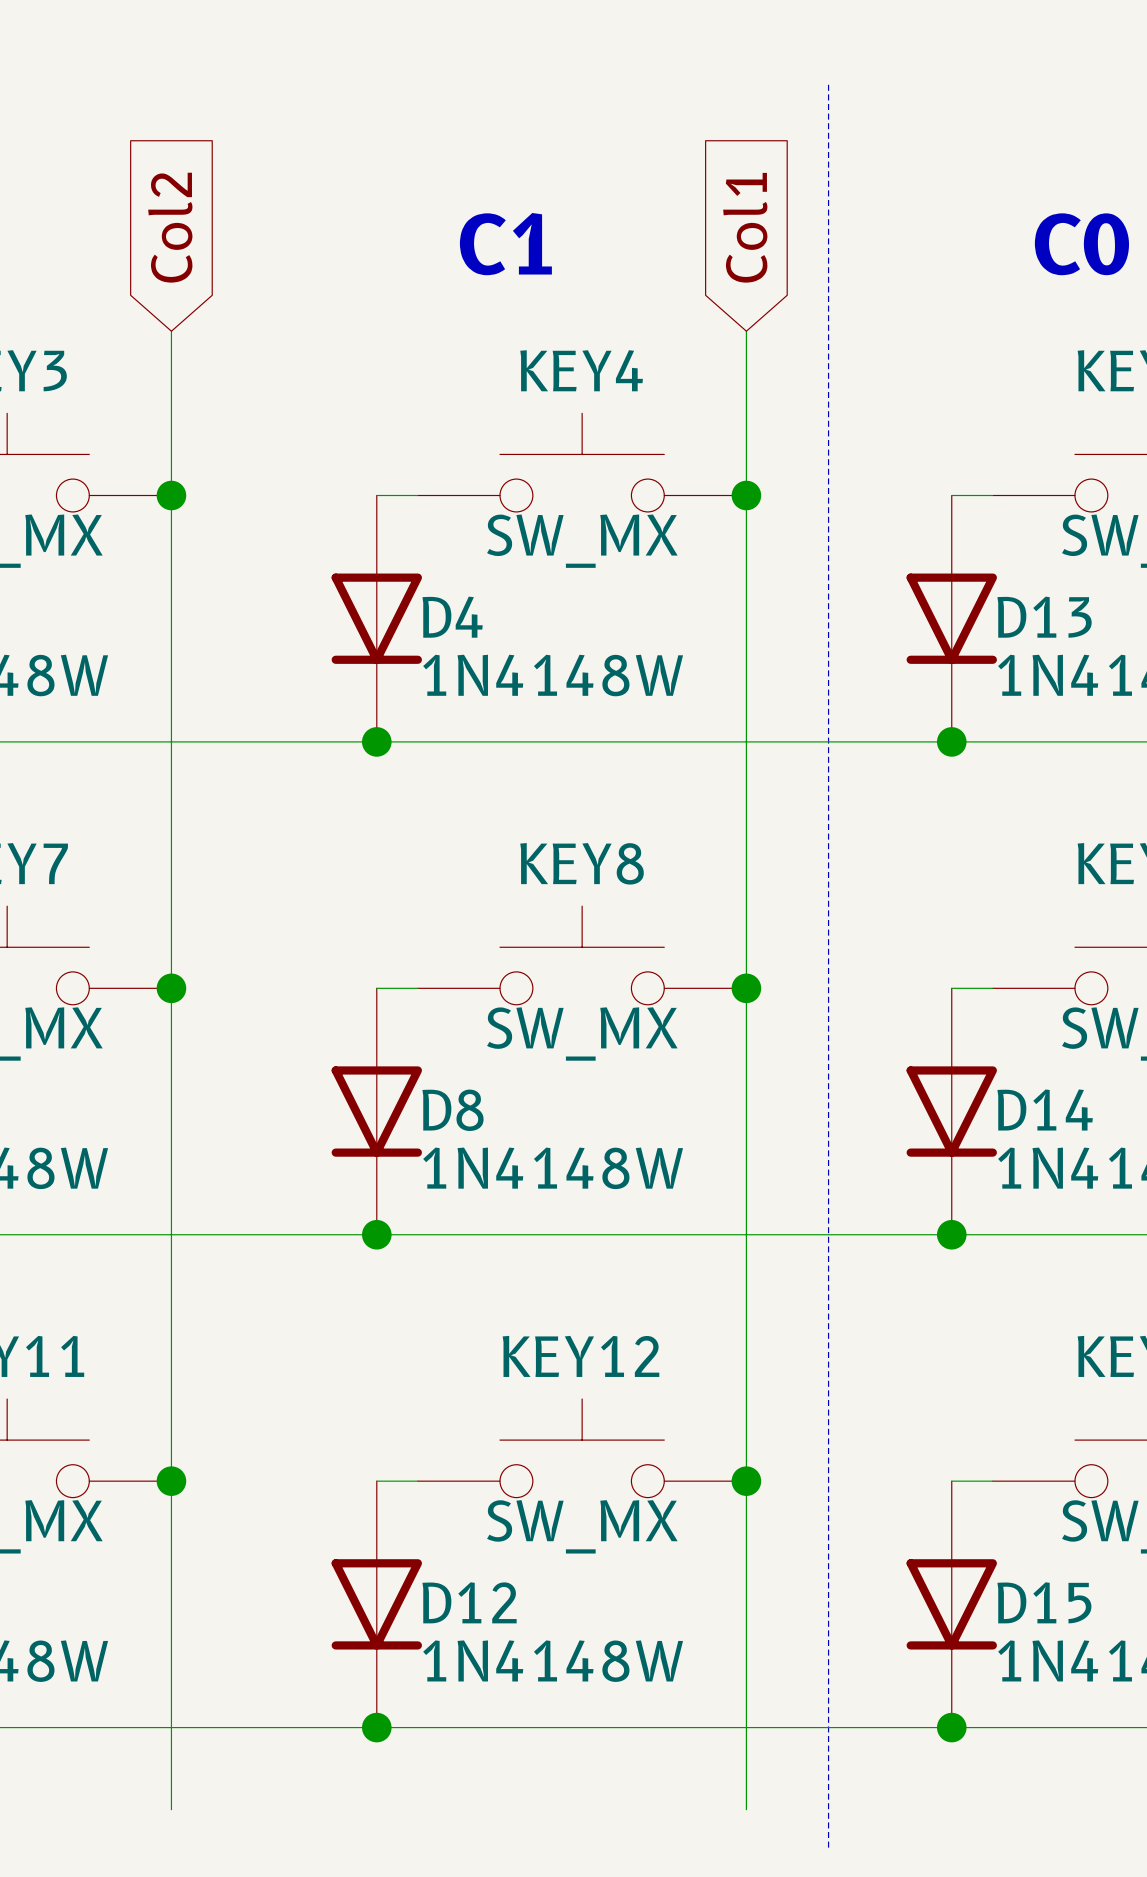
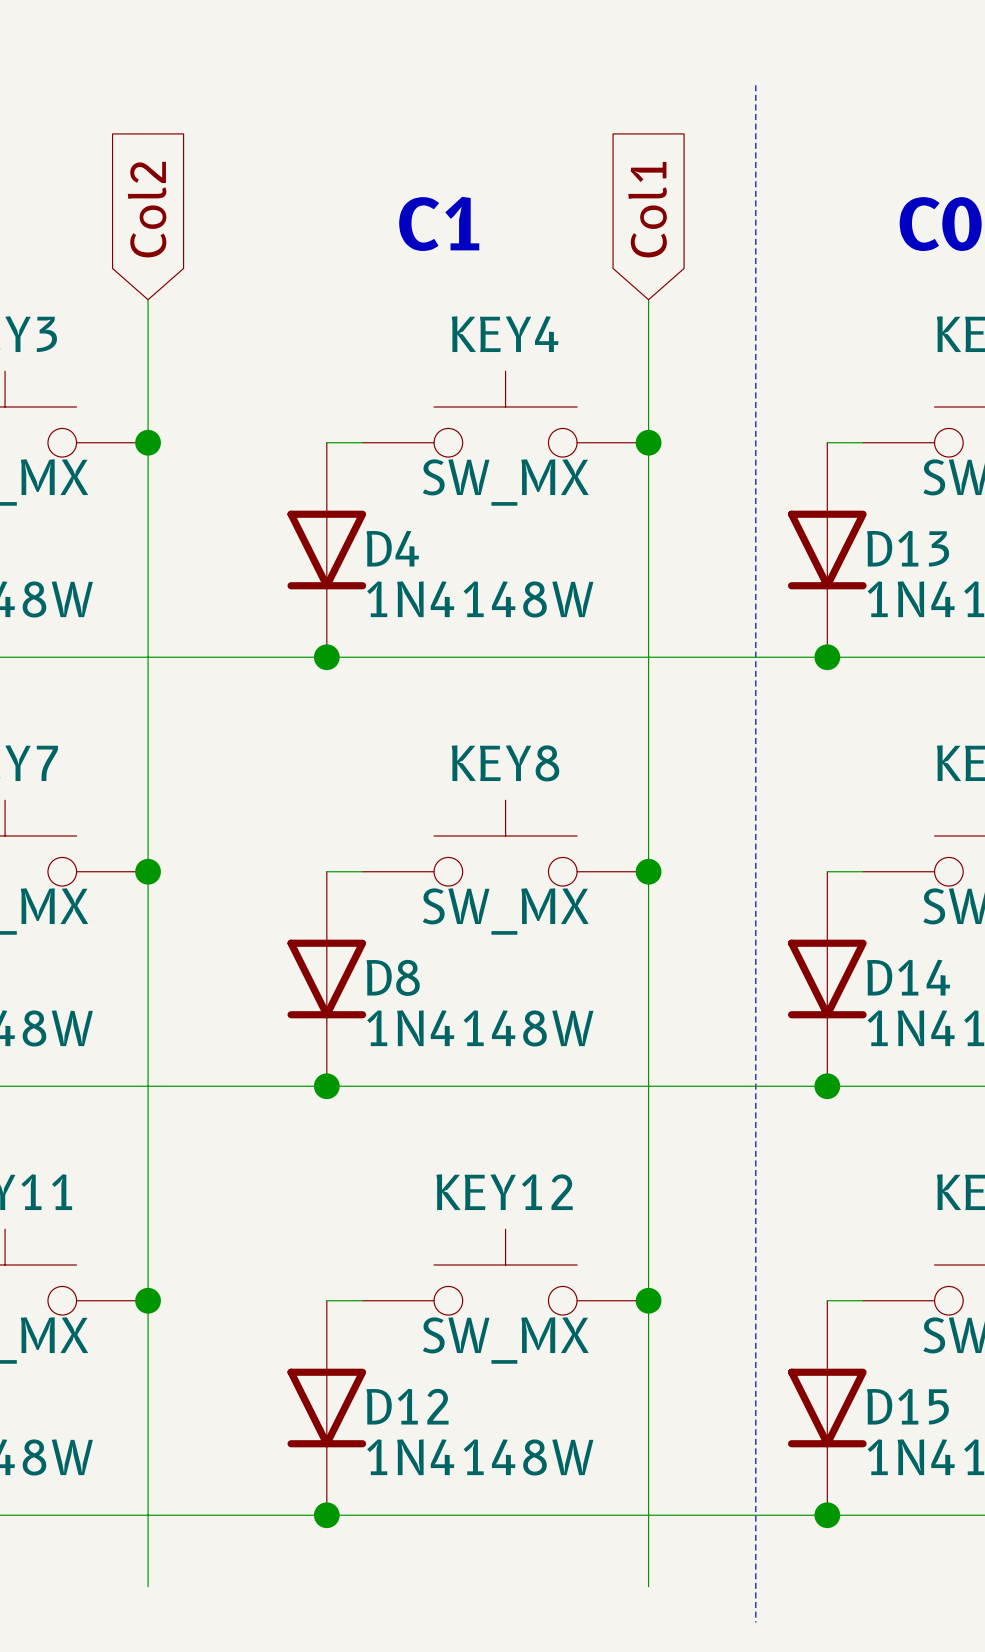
line: (828, 84) (828, 1850) -> (755, 85) (755, 1622)

